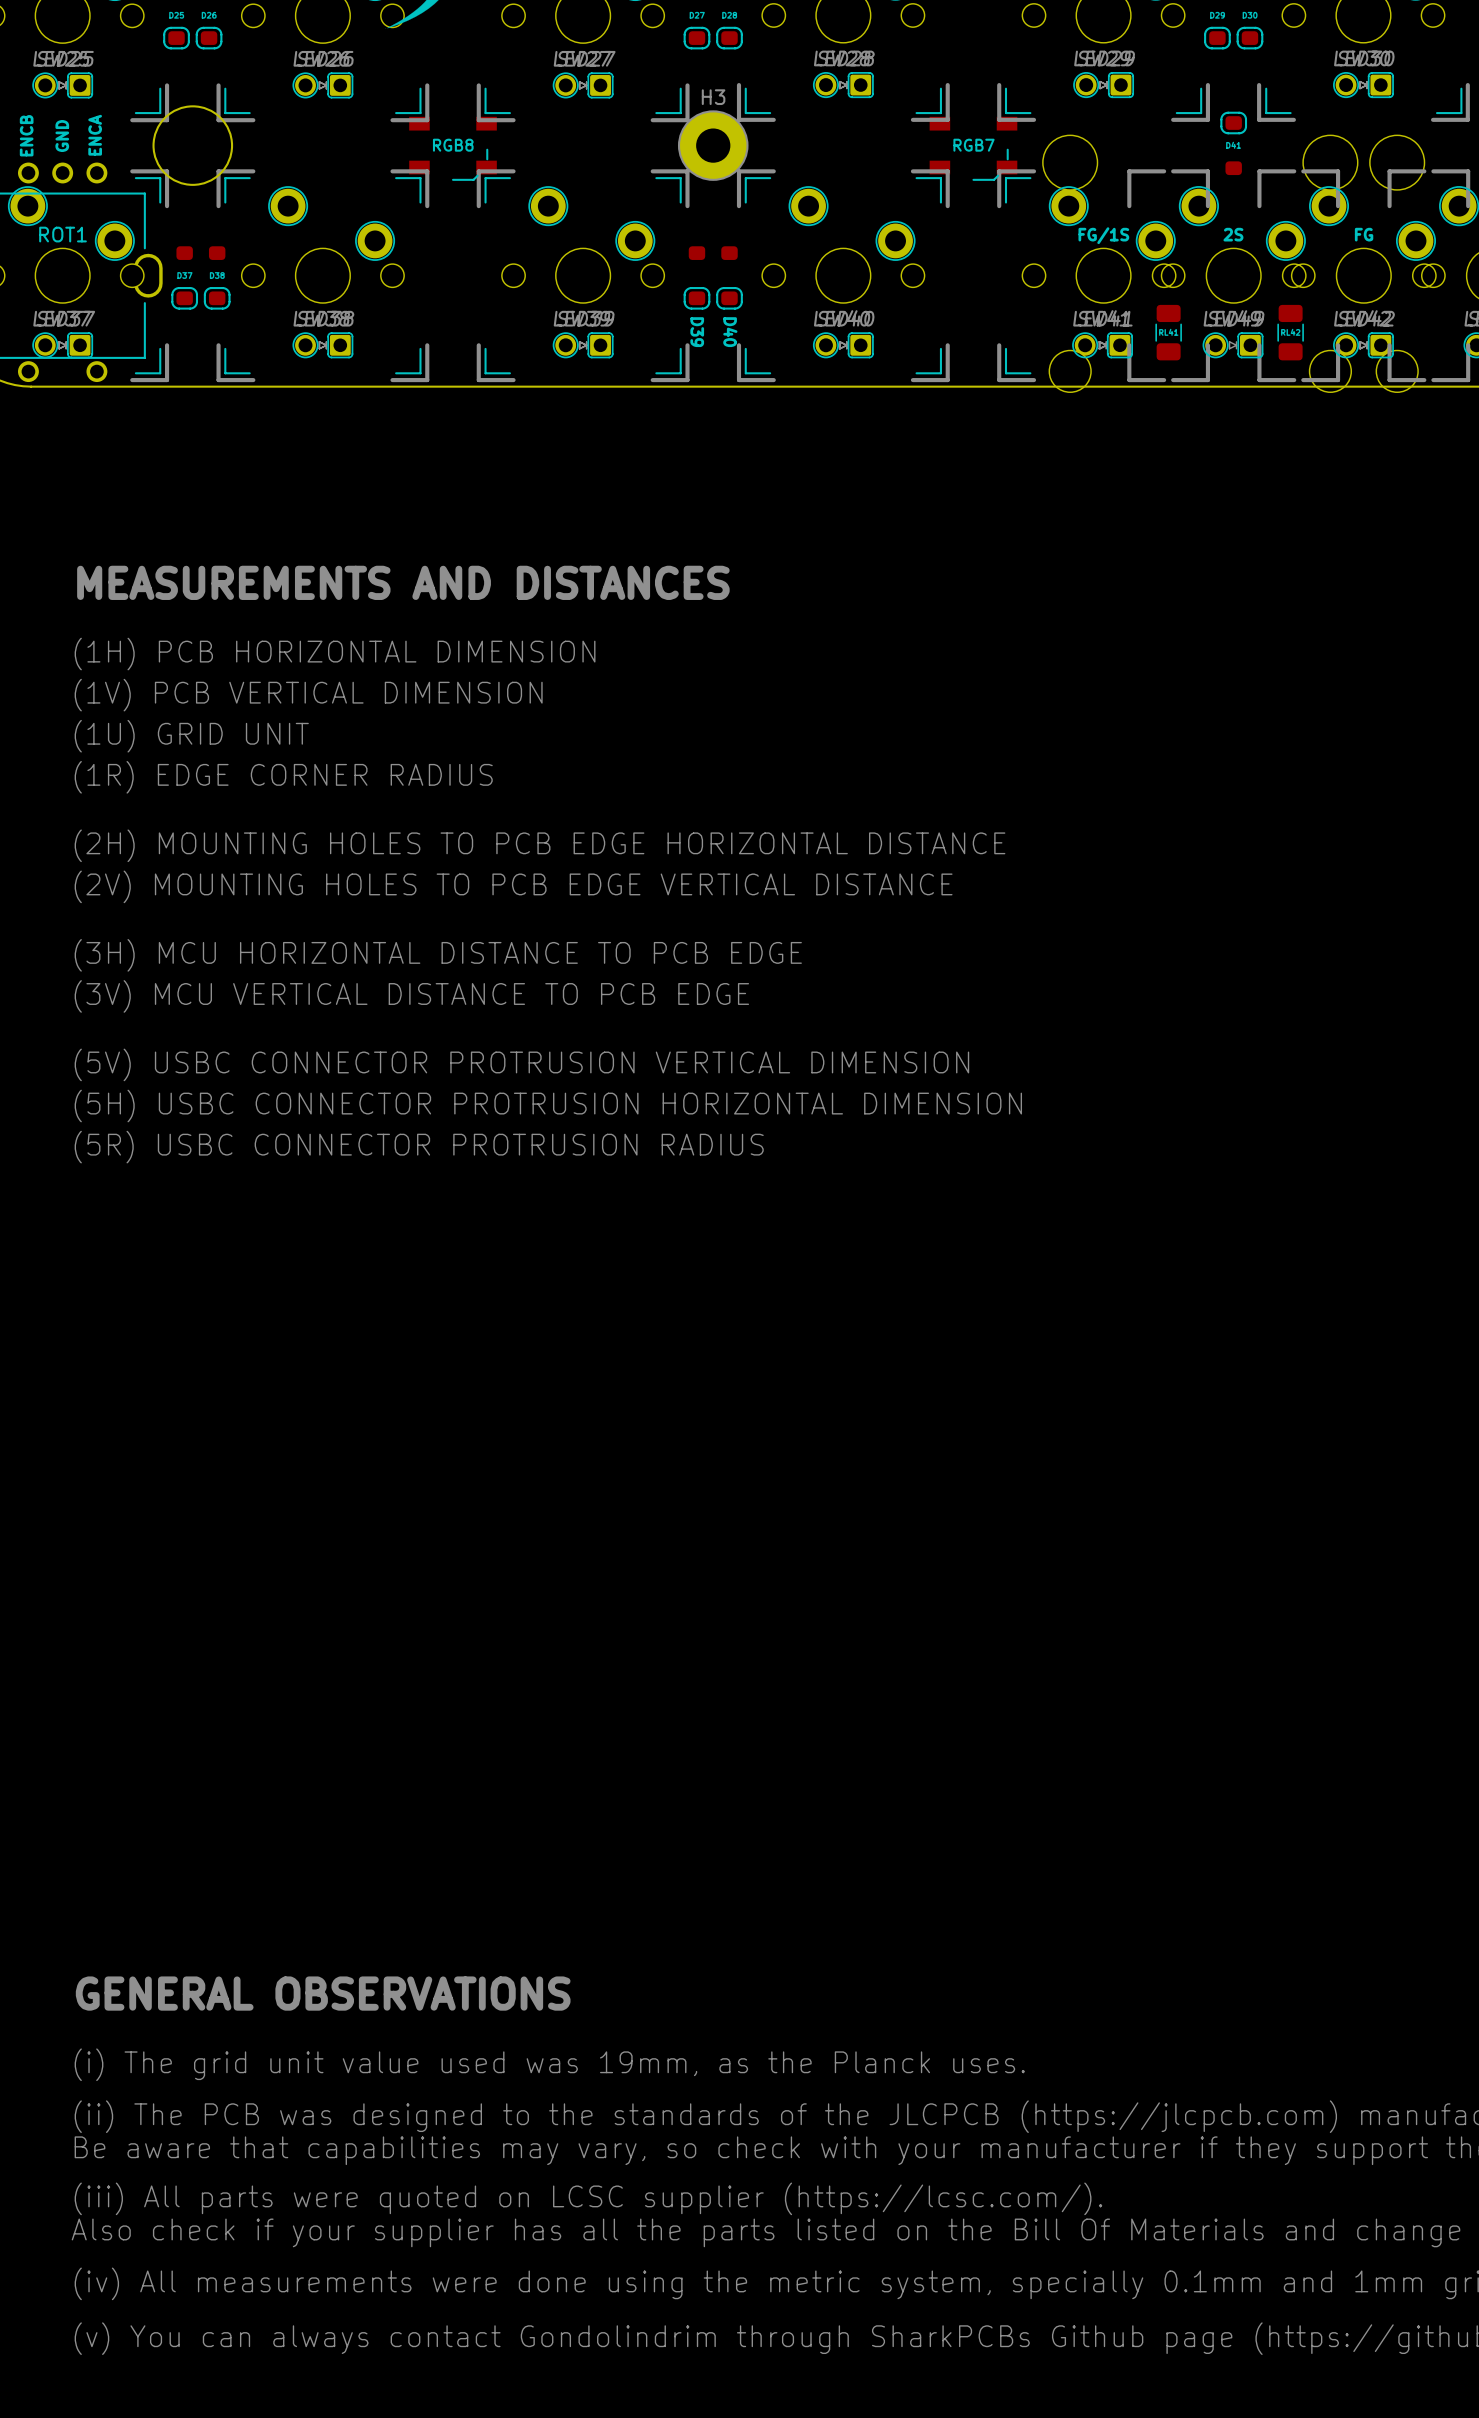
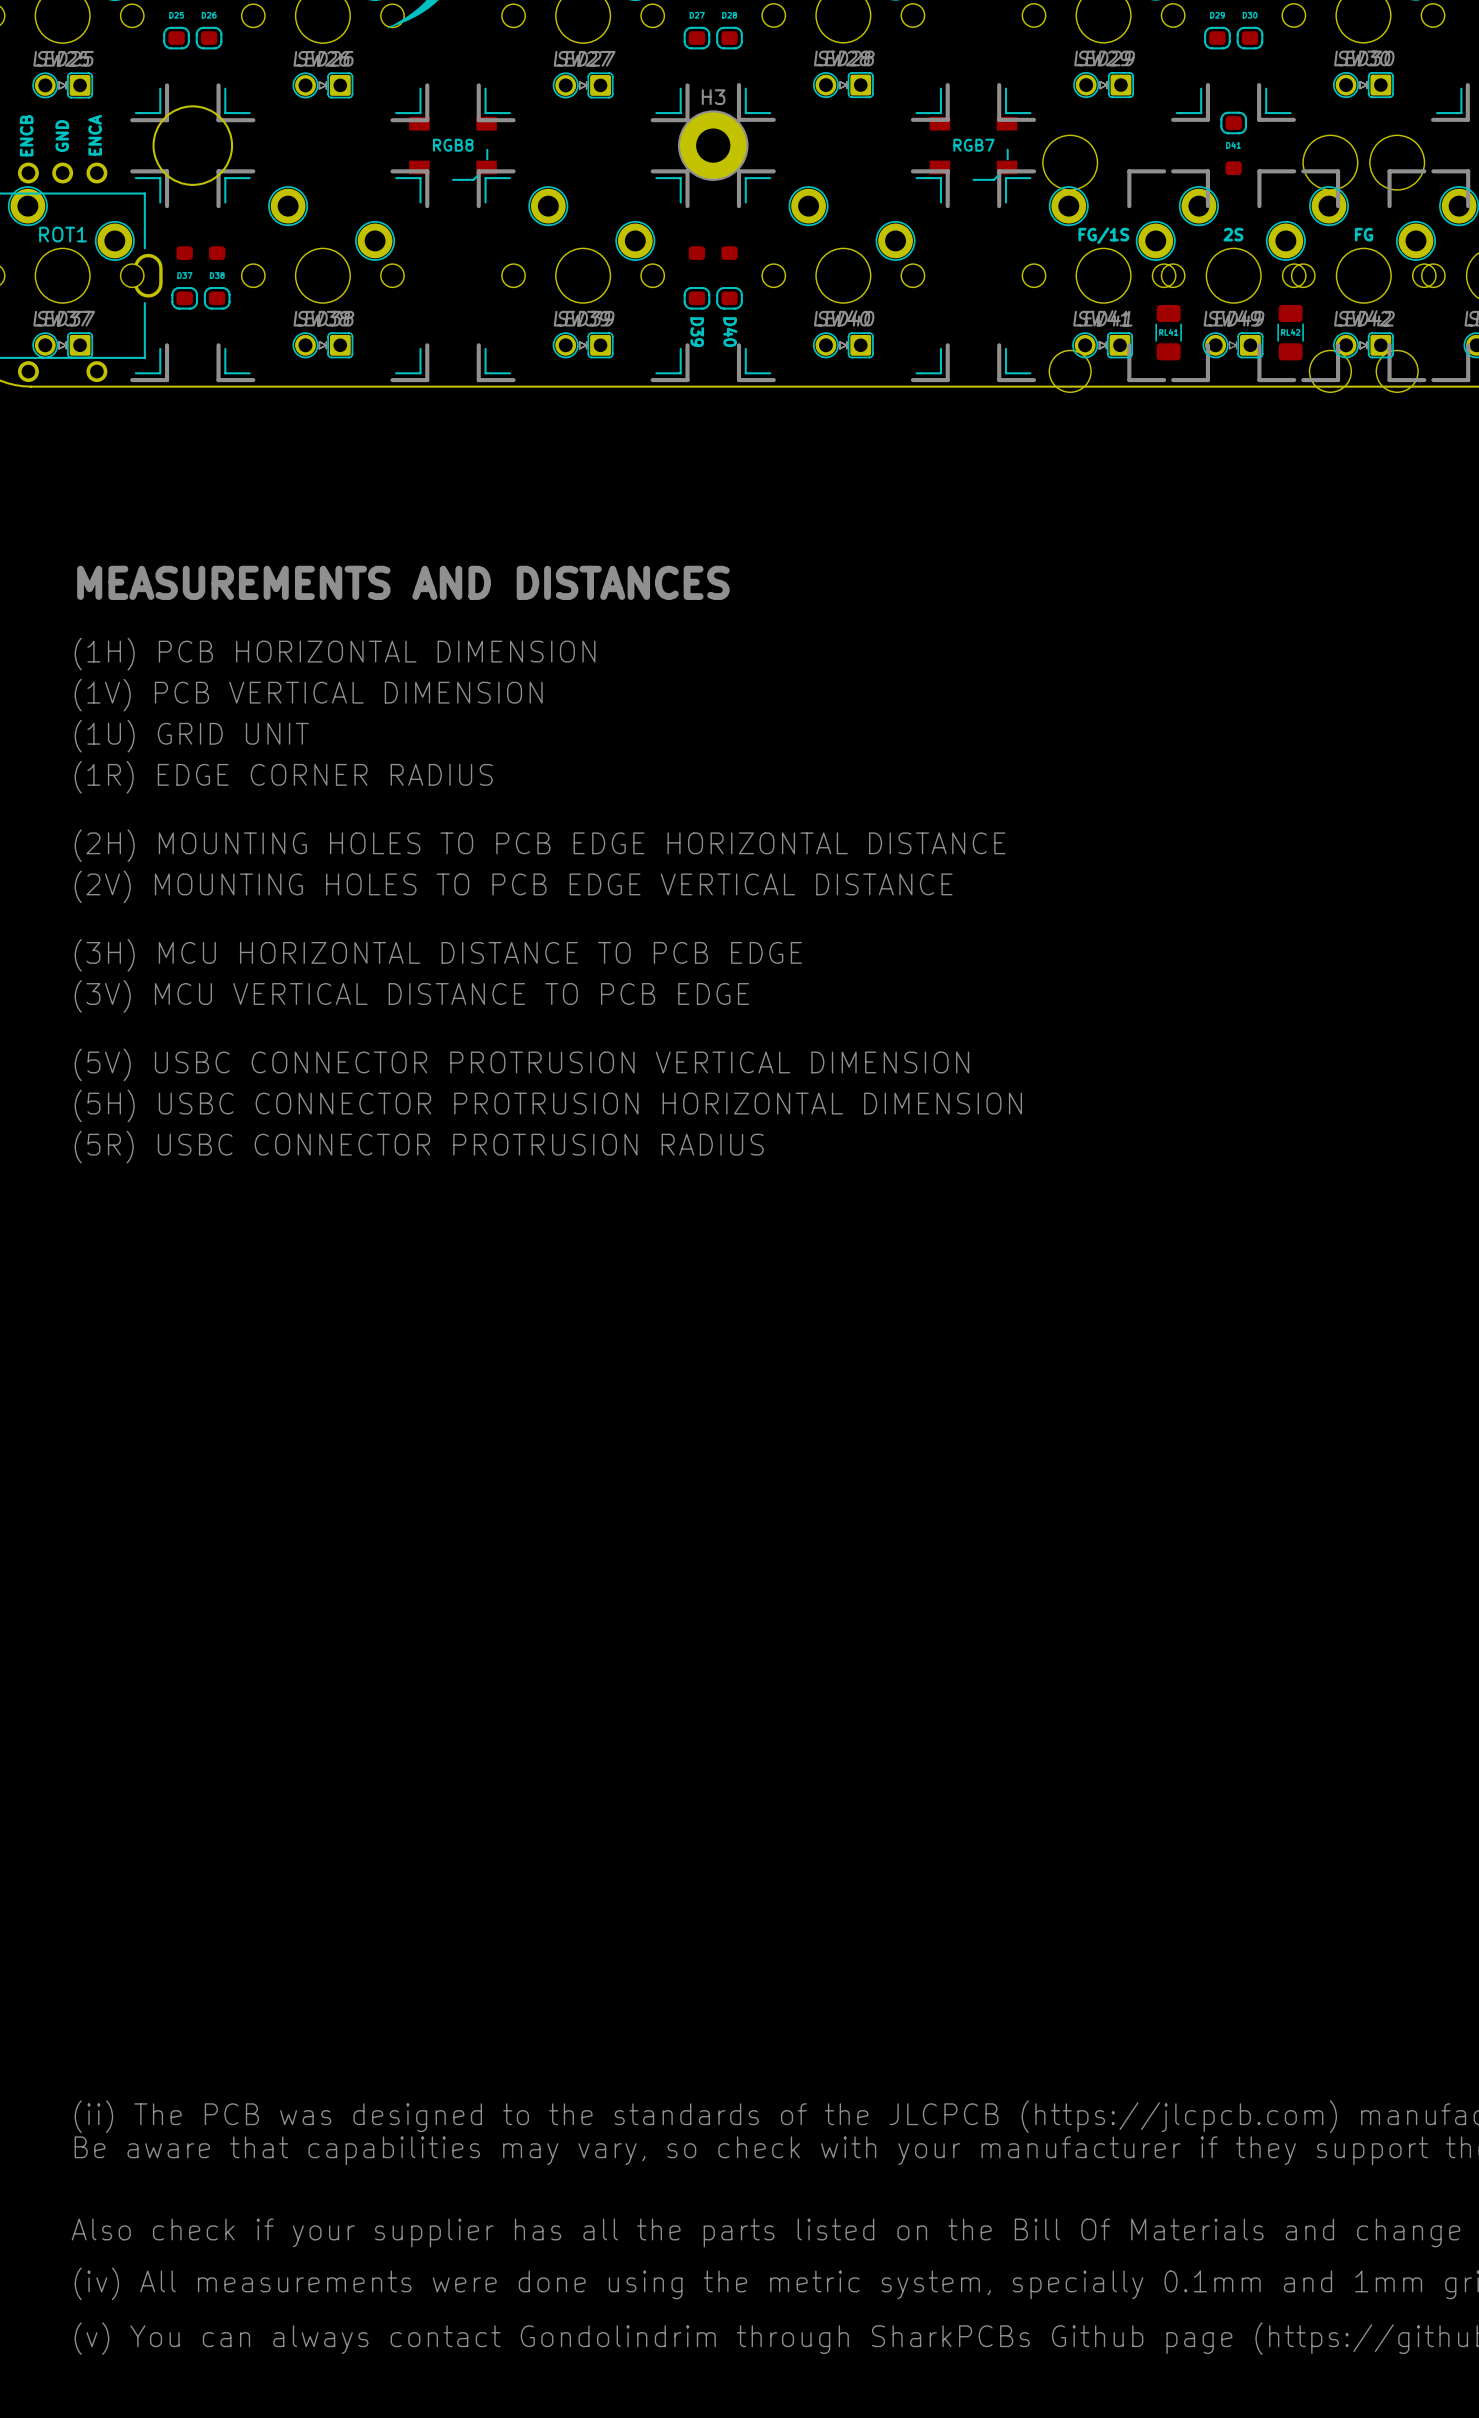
text: GENERAL OBSERVATIONS (323, 1993) -> none
text: (i) The grid unit value used was 19mm, as the Planck uses. (549, 2064) -> none
text: (iii) All parts were quoted on LCSC supplier (https://lcsc.com/). (588, 2198) -> none

